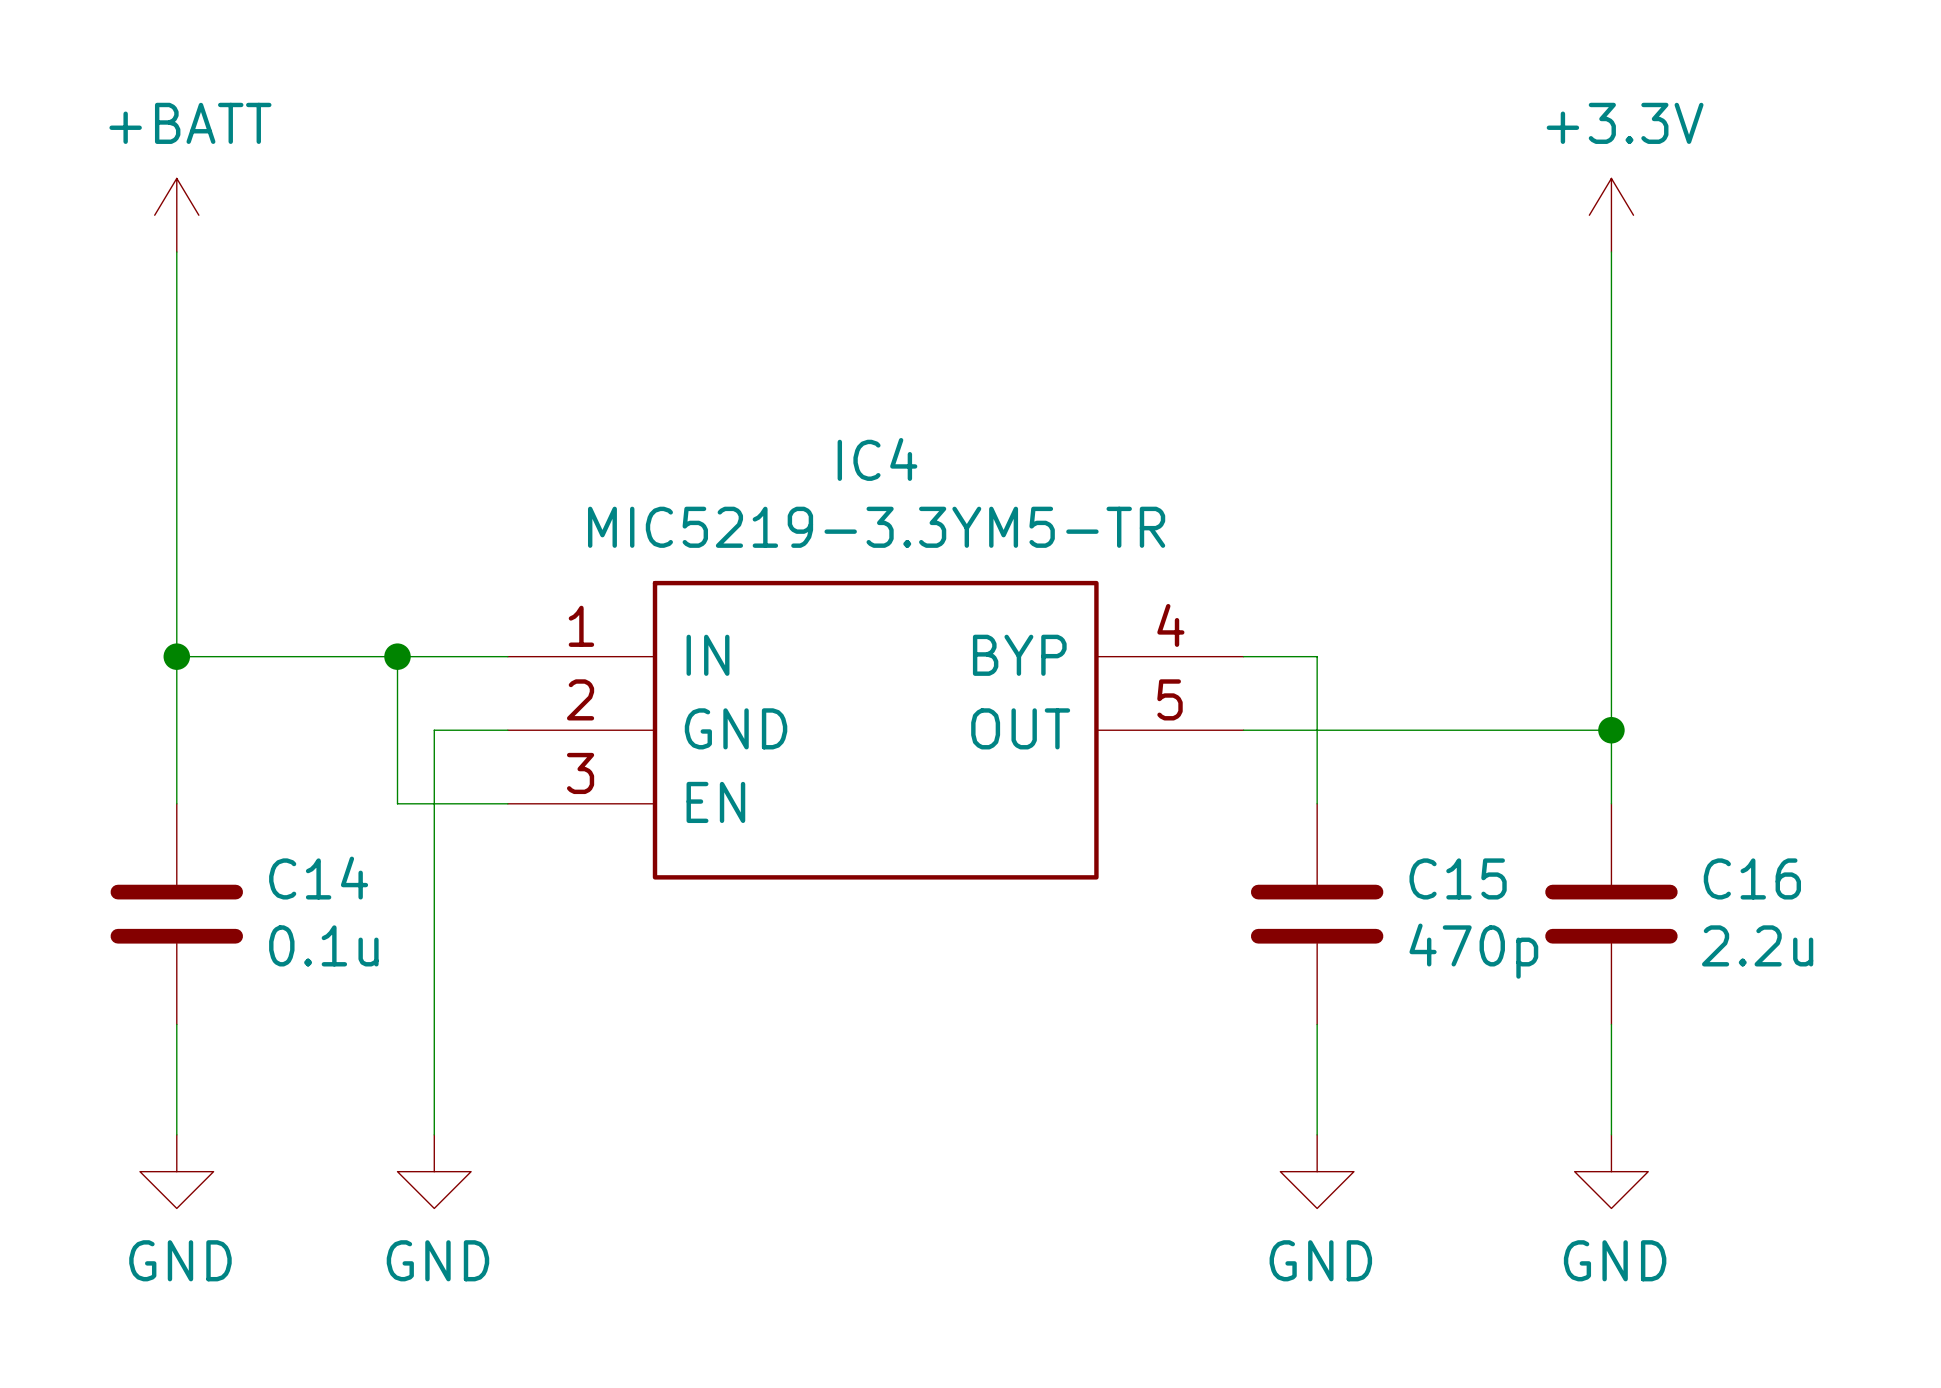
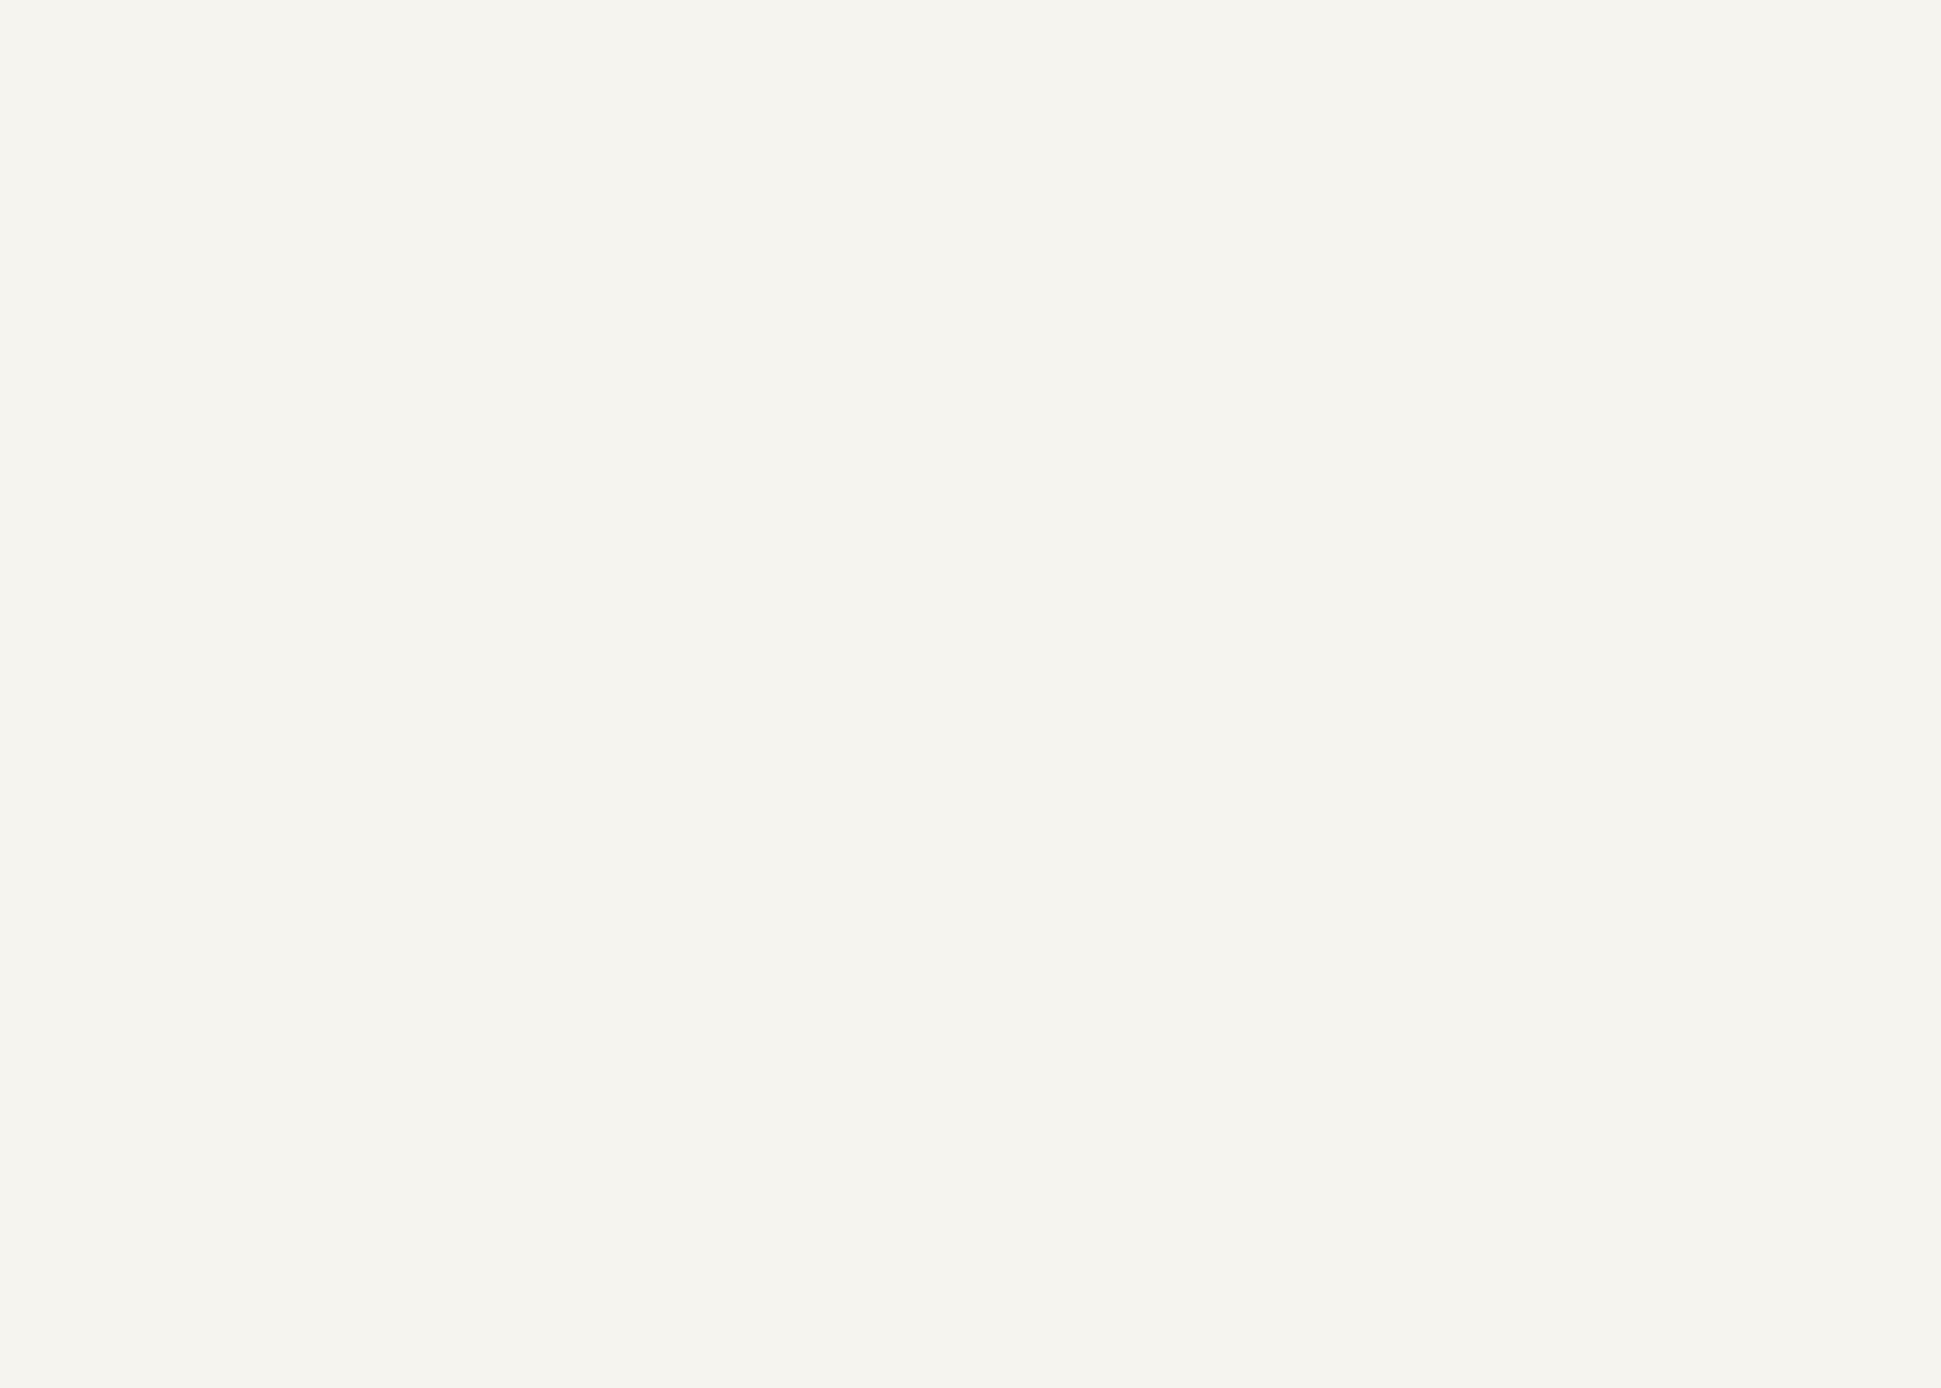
power symbol: +BATT (176, 215) -> none
power symbol: +3.3V (1611, 215) -> none
wire: (176, 252) (176, 803) -> none
wire: (1611, 252) (1611, 803) -> none
wire: (176, 656) (507, 656) -> none
junction: (176, 656) -> none
wire: (397, 656) (397, 803) (507, 803) -> none
junction: (397, 656) -> none
wire: (1243, 656) (1317, 656) (1317, 803) -> none
wire: (507, 730) (434, 730) (434, 1134) -> none
IC4: MIC5219-3.3YM5-TR (875, 730) -> none
wire: (1243, 730) (1611, 730) -> none
junction: (1611, 730) -> none
C14: 0.1u (176, 914) -> none
C15: 470p (1317, 914) -> none
C16: 2.2u (1611, 914) -> none
wire: (176, 1024) (176, 1134) -> none
wire: (1317, 1024) (1317, 1134) -> none
wire: (1611, 1024) (1611, 1134) -> none
power symbol: GND (176, 1171) -> none
power symbol: GND (434, 1171) -> none
power symbol: GND (1317, 1171) -> none
power symbol: GND (1611, 1171) -> none

